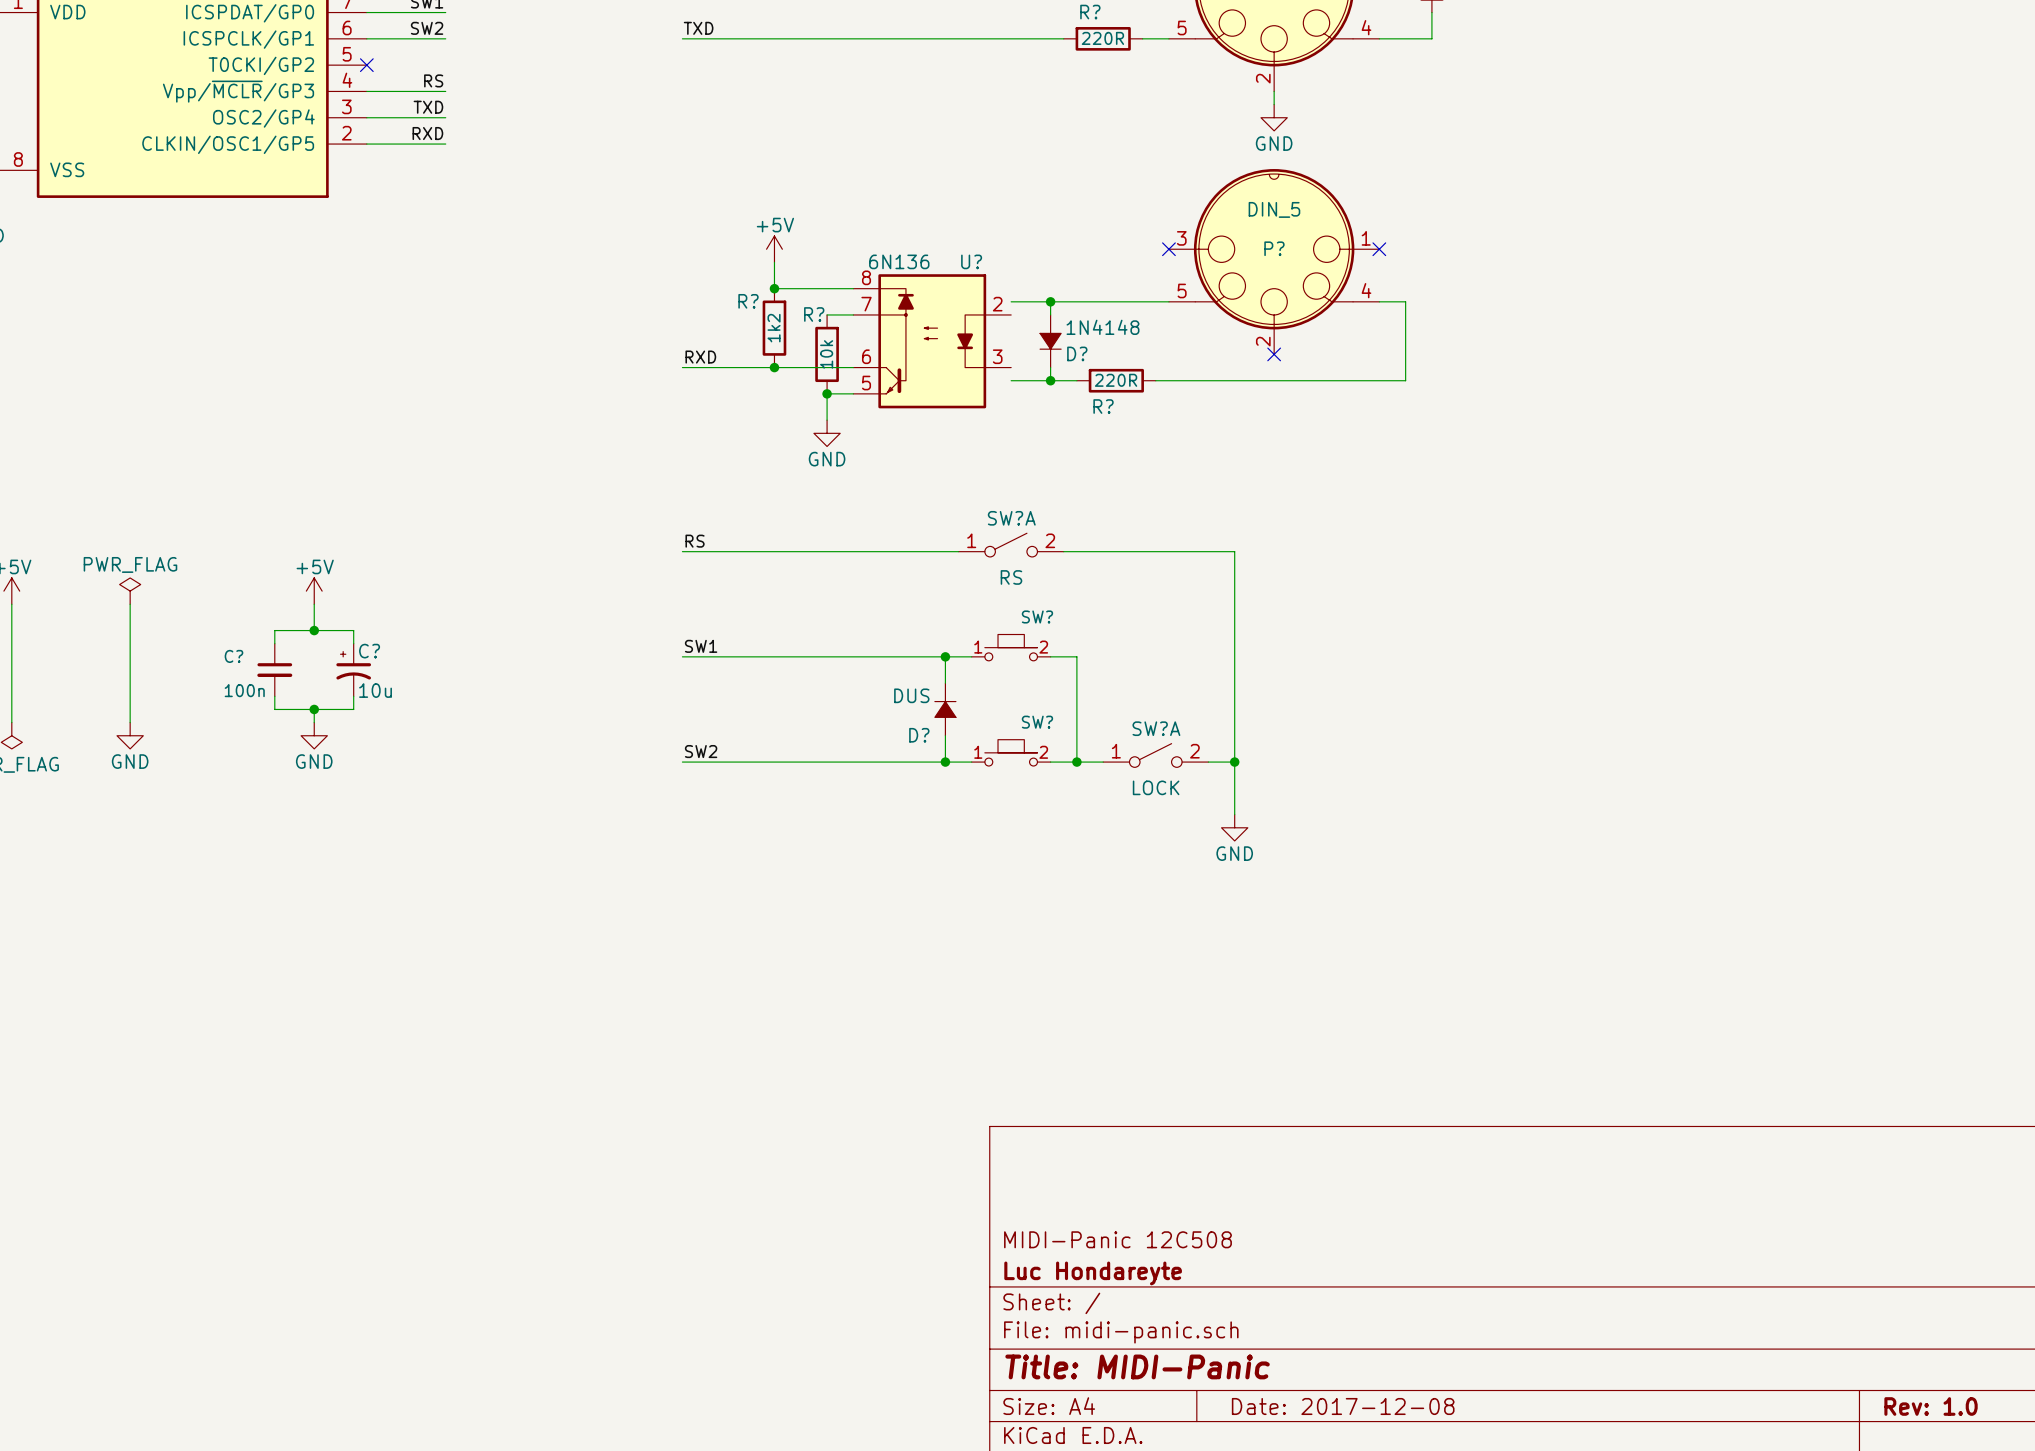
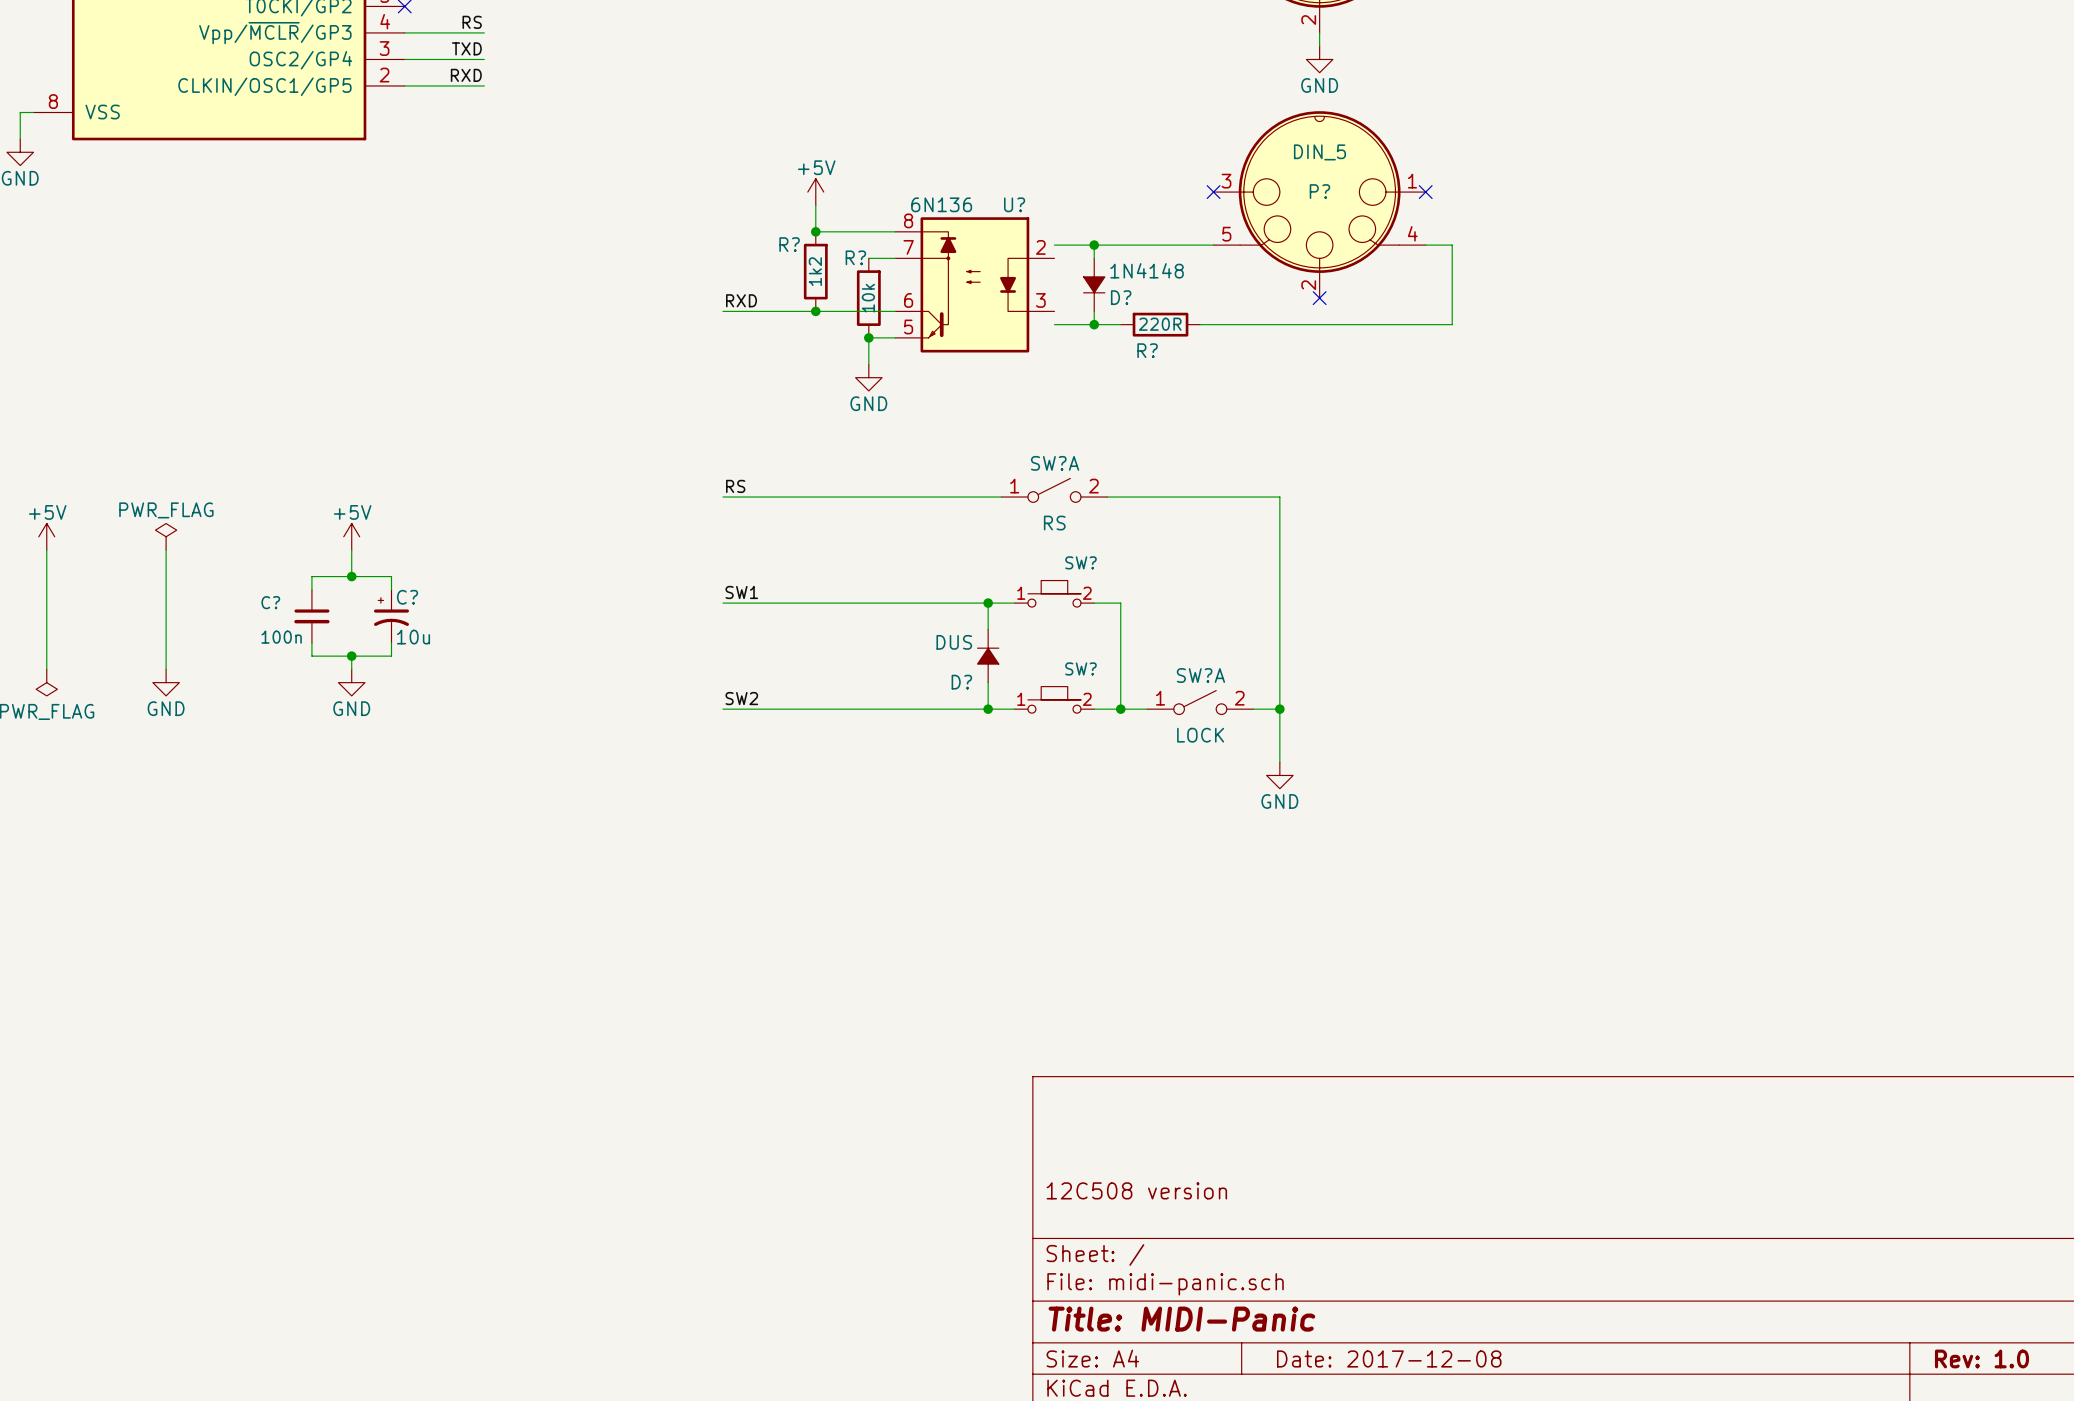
title block: MIDI-Panic 12C508 (1117, 1239) -> 12C508 version (1136, 1190)
title block: Luc Hondareyte (1093, 1273) -> none

